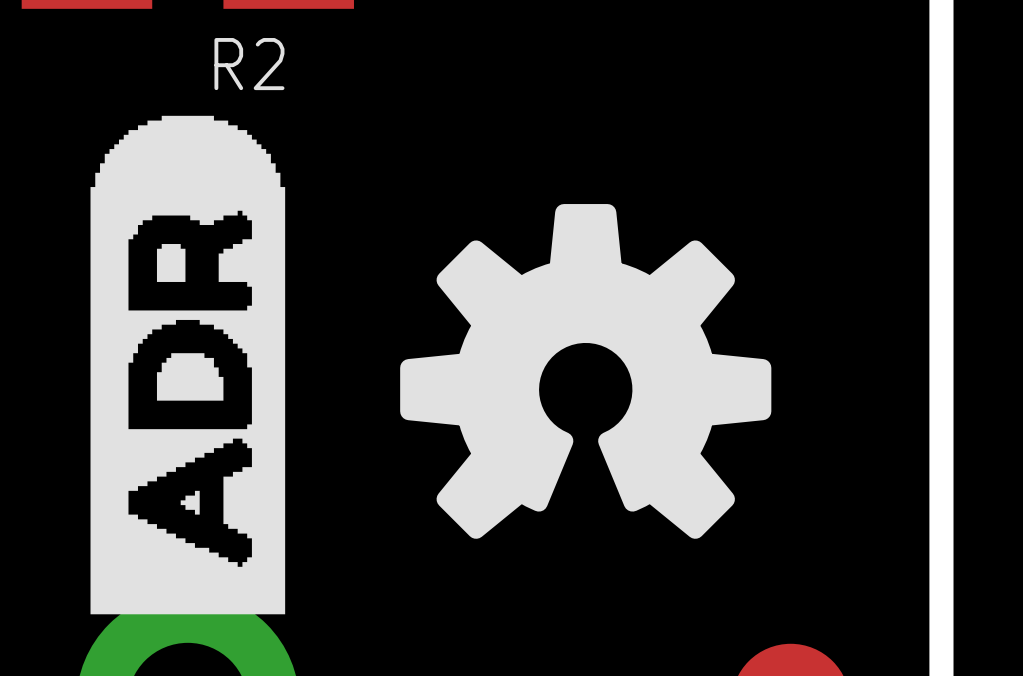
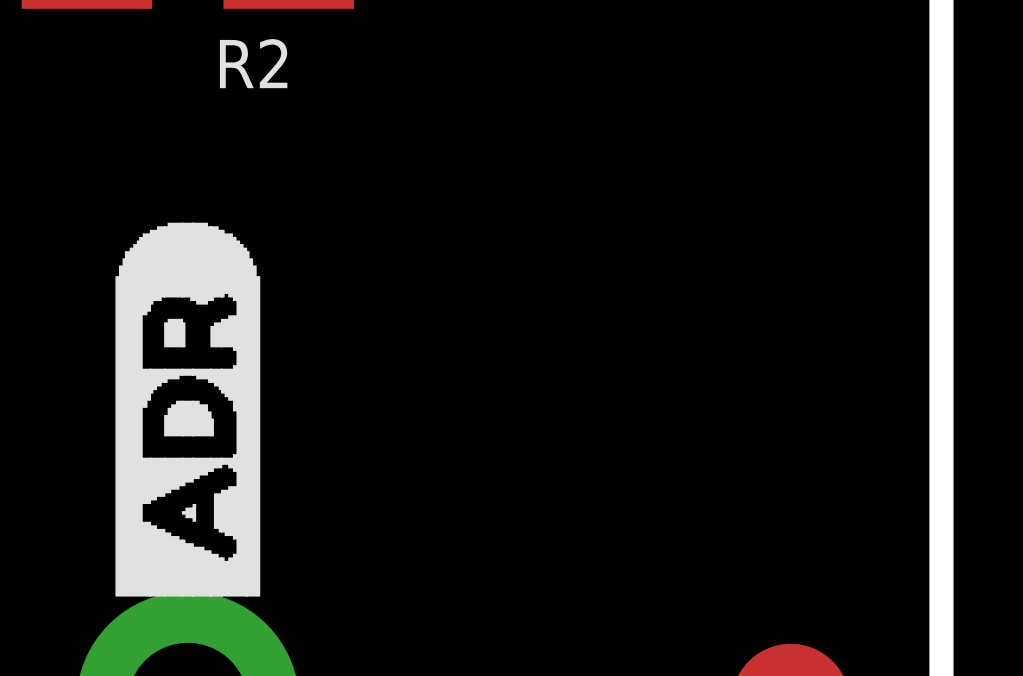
drawing shape: [90, 115, 286, 615] -> [115, 222, 261, 597]
drawing: [400, 204, 772, 539] -> none

